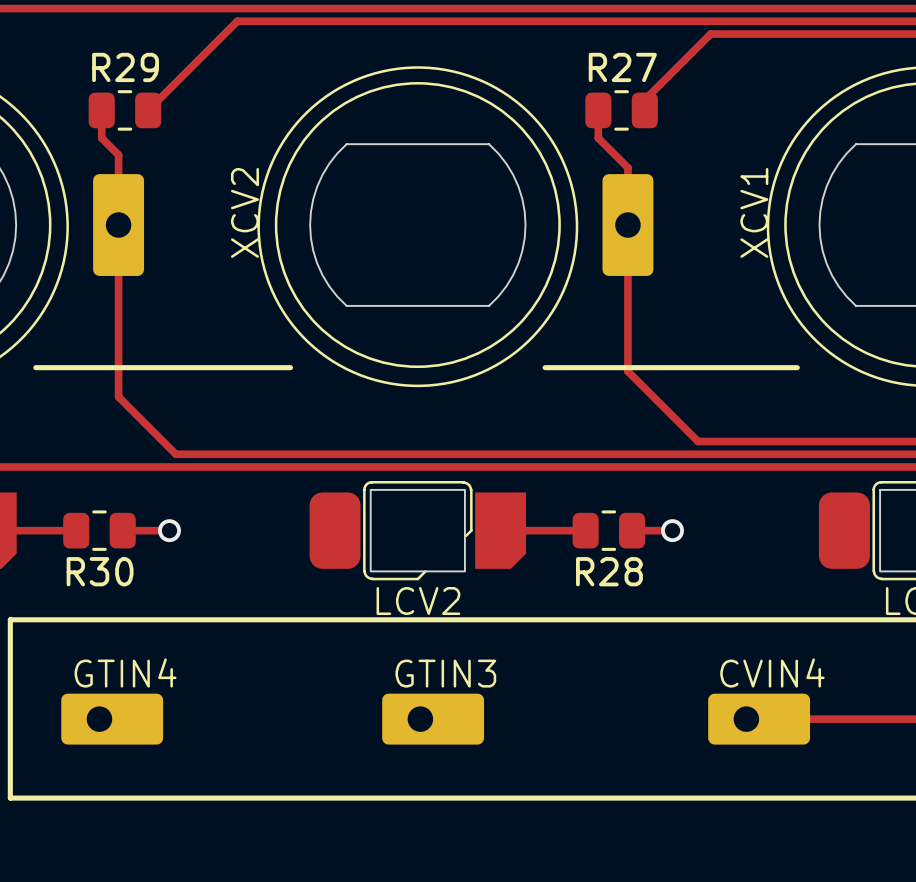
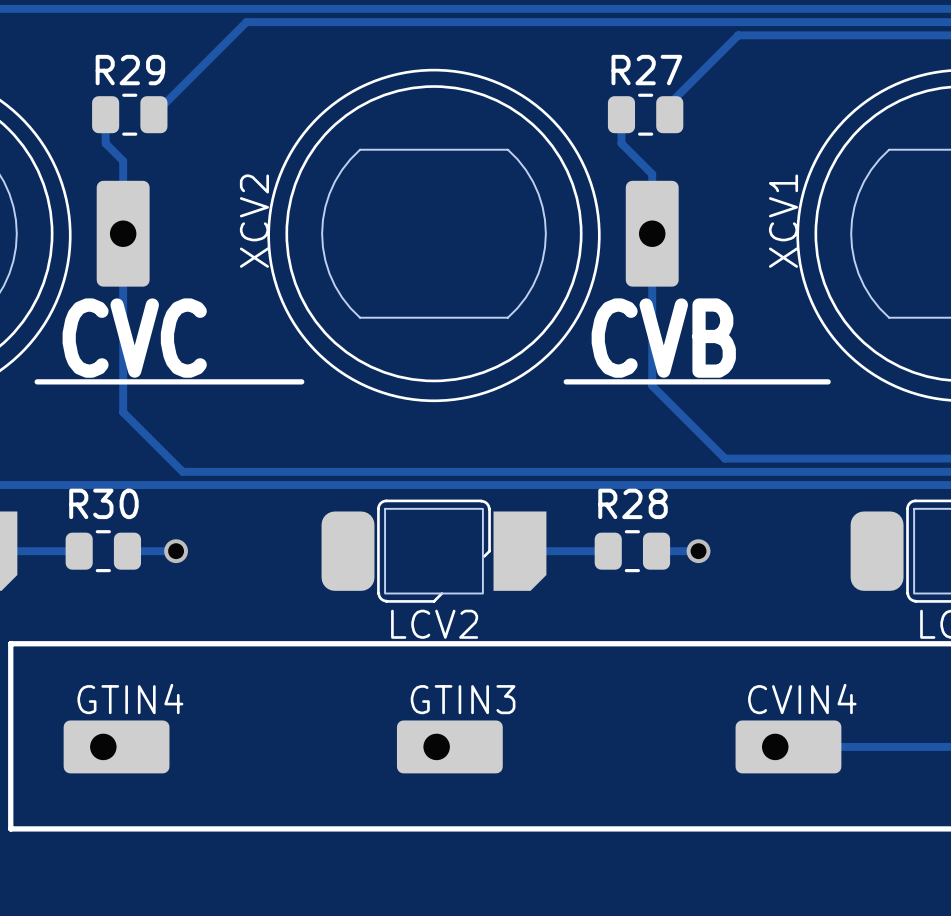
text: none -> CVC (134, 338)
text: none -> CVB (663, 338)
R30 name position: R30 (100, 571) -> R30 (103, 503)
R28 name position: R28 (609, 571) -> R28 (633, 503)

